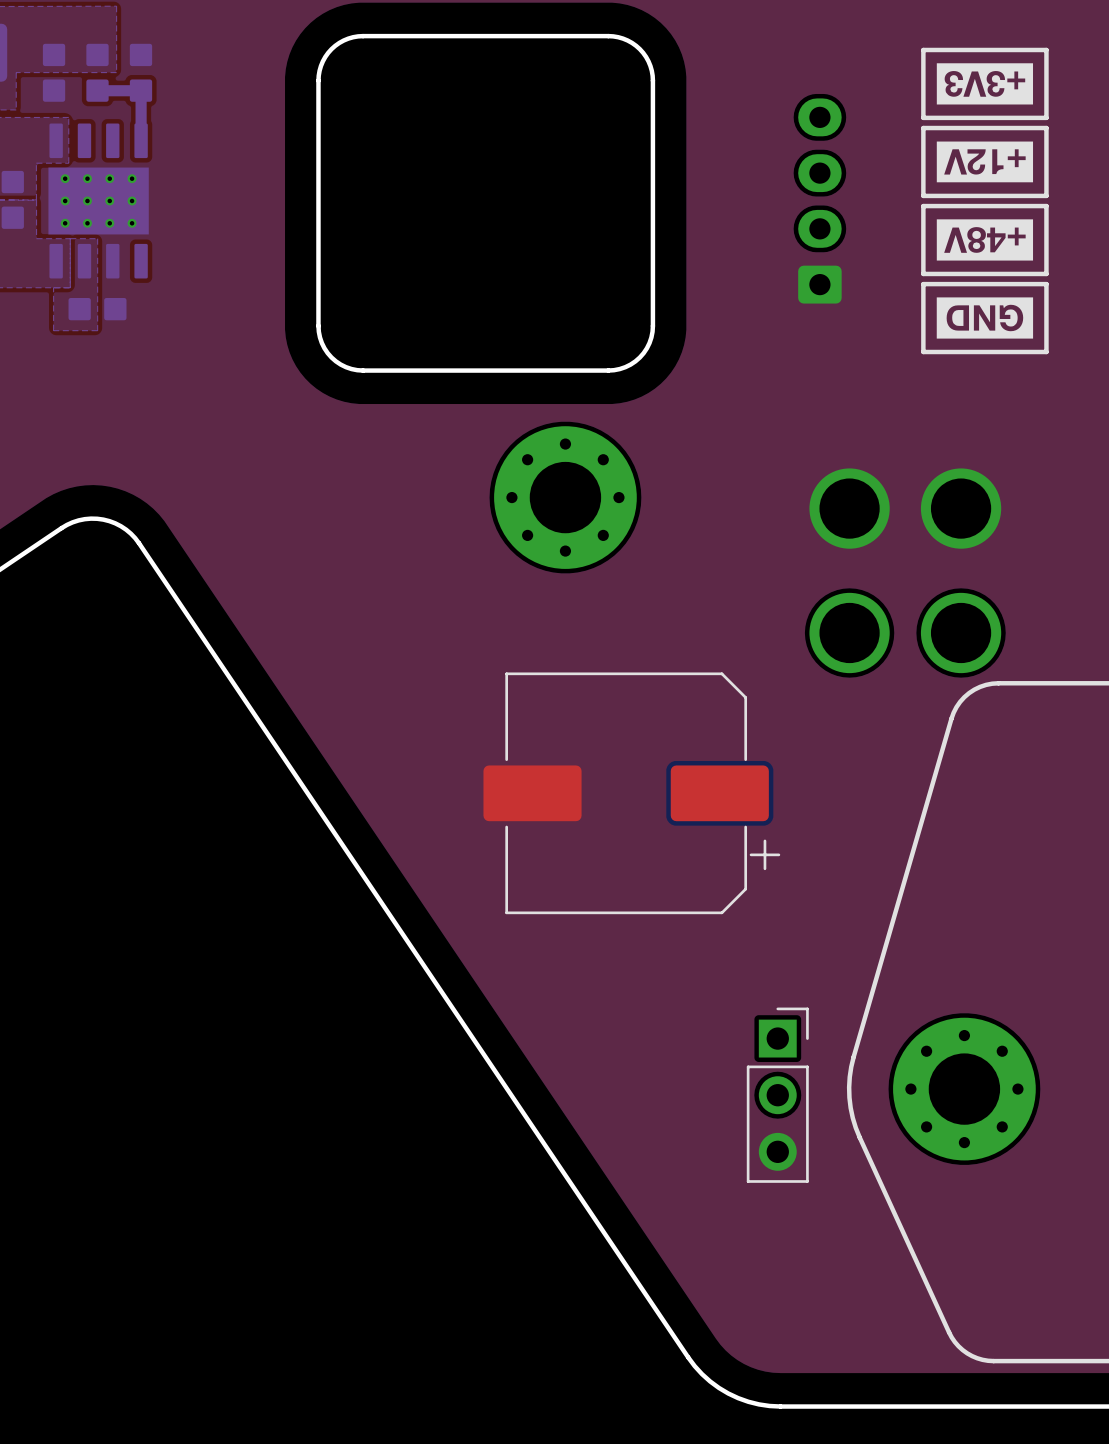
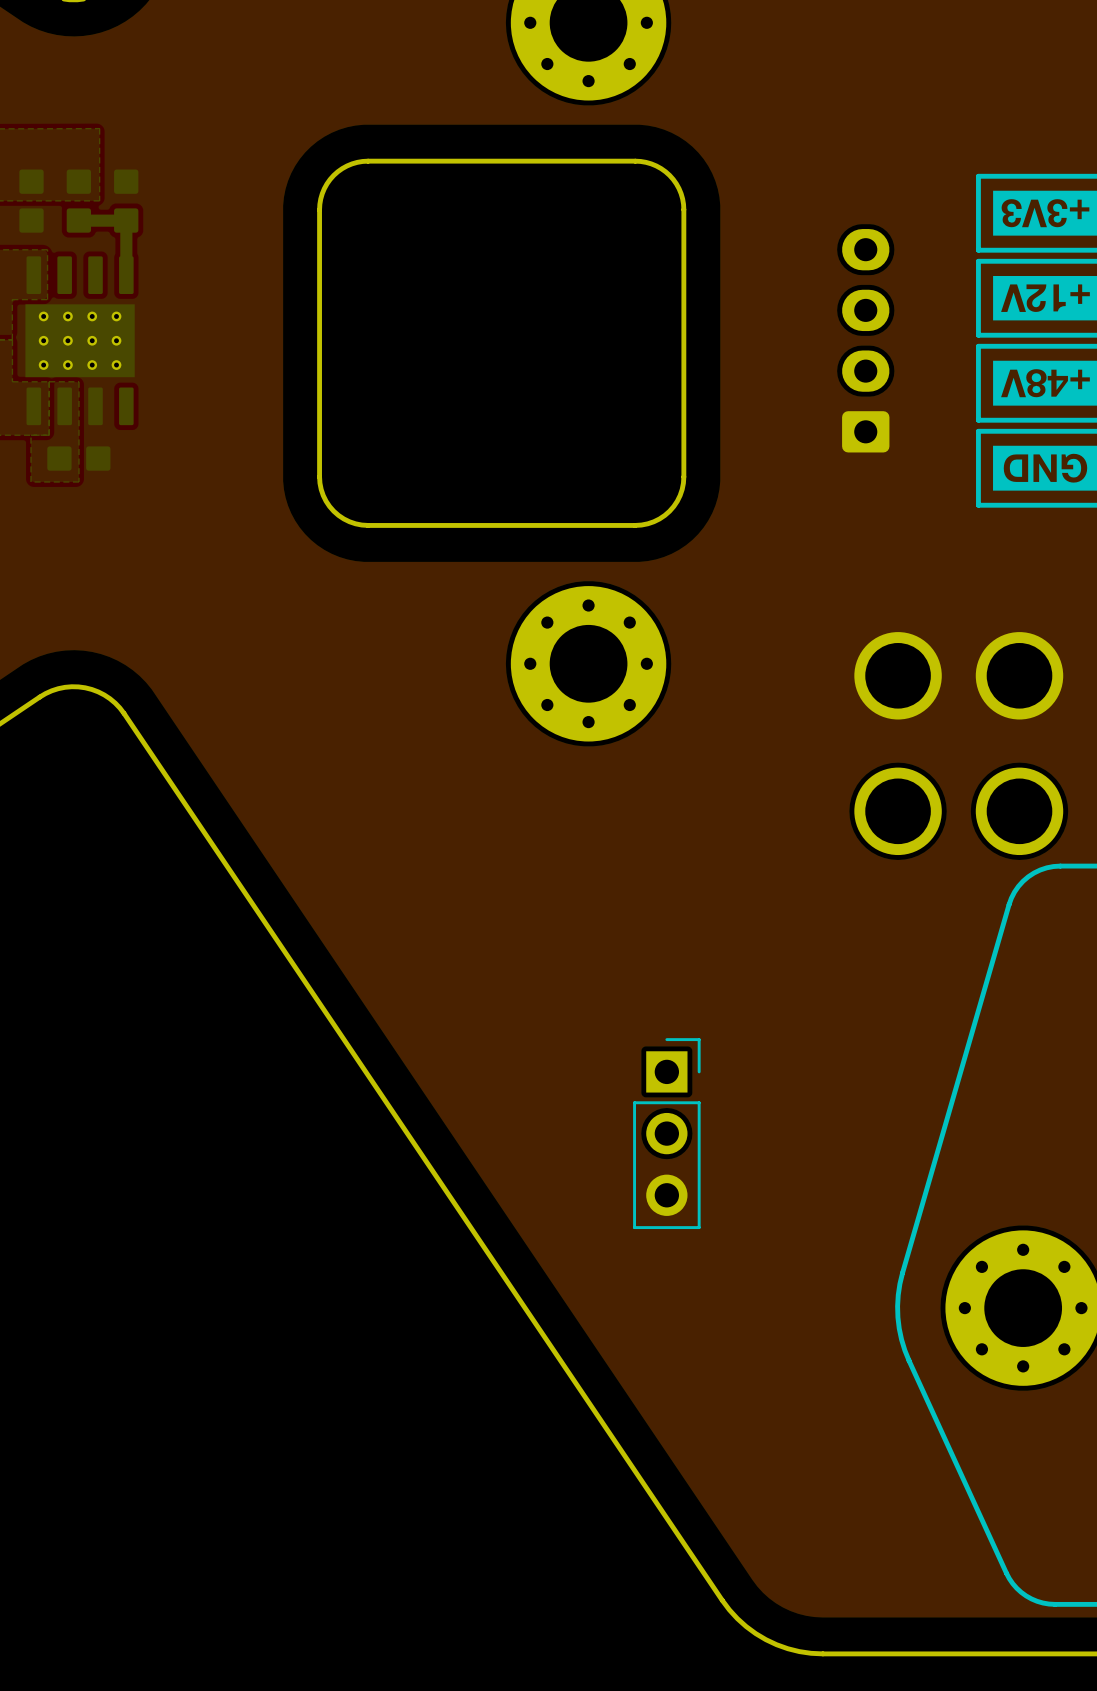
part: (631, 793) -> none
part position: (777, 1095) -> (666, 1133)

